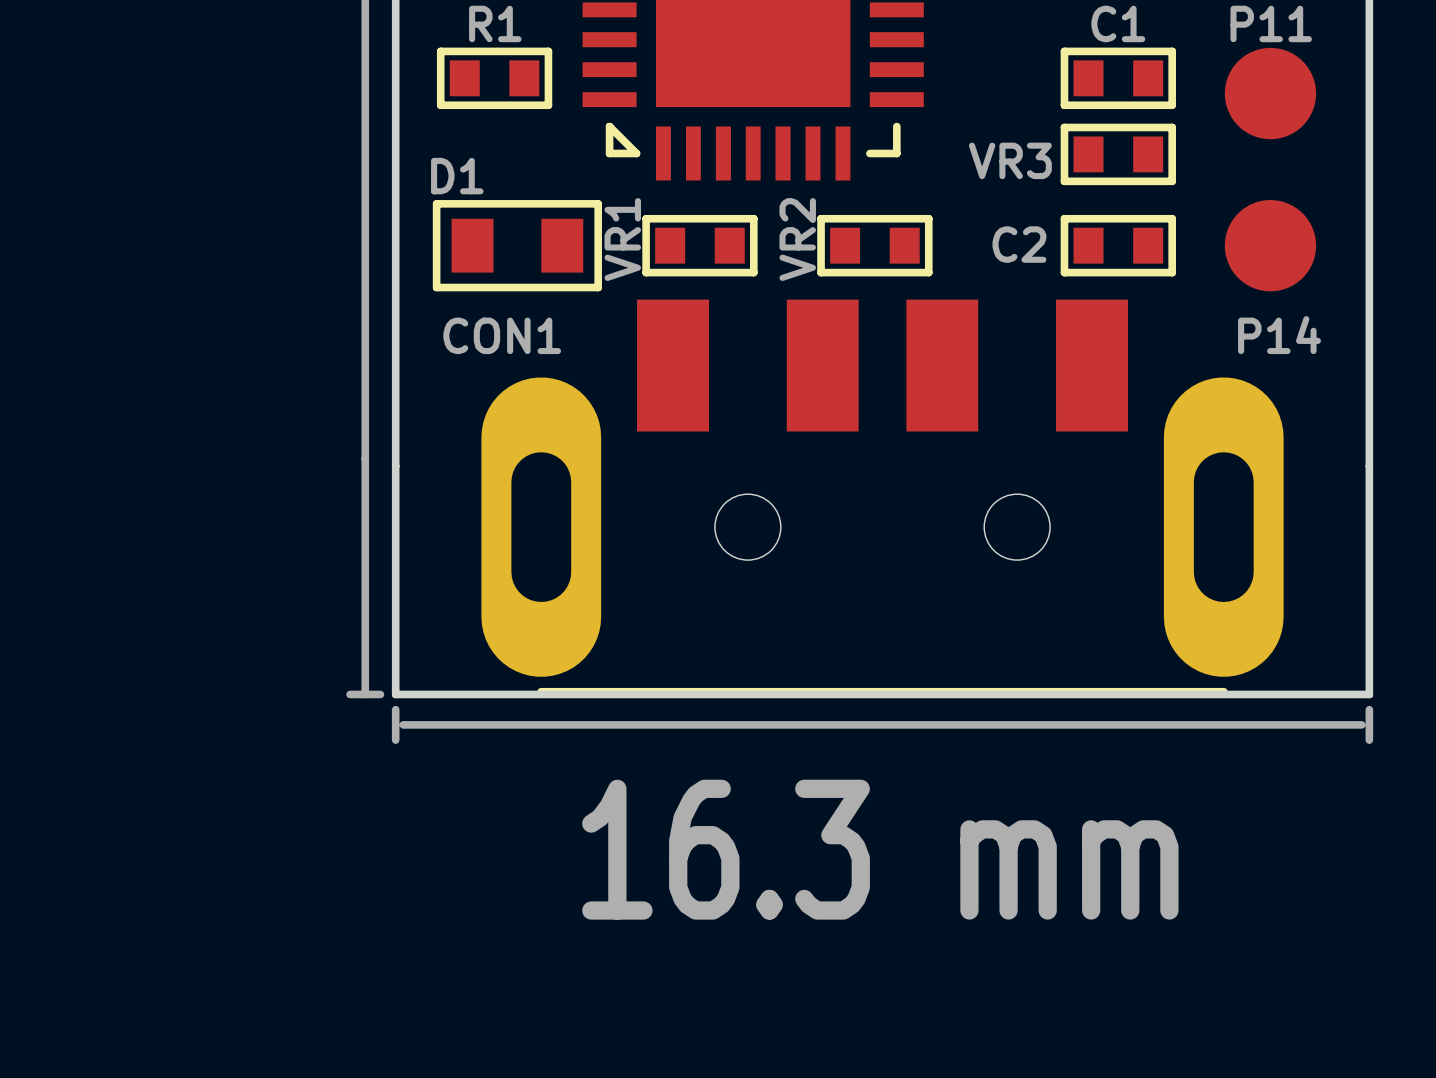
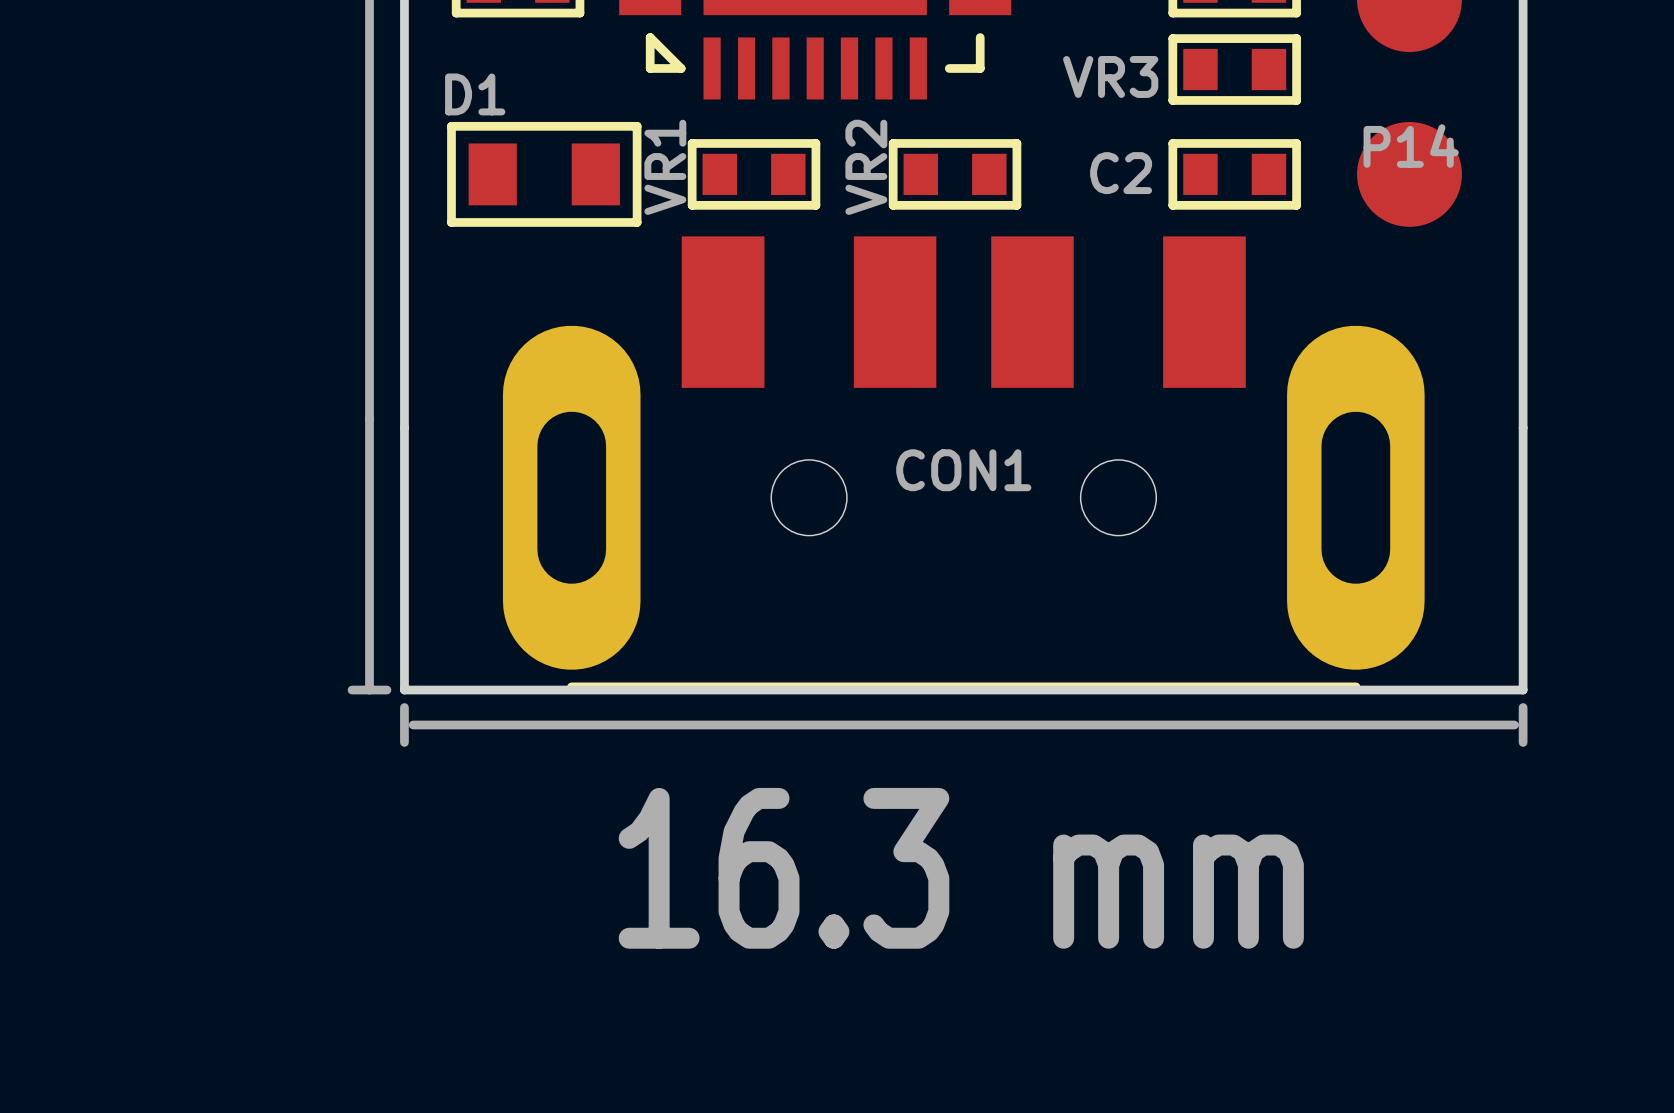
CON1 name position: CON1 (502, 335) -> CON1 (963, 470)
P14 name position: P14 (1279, 335) -> P14 (1411, 146)

